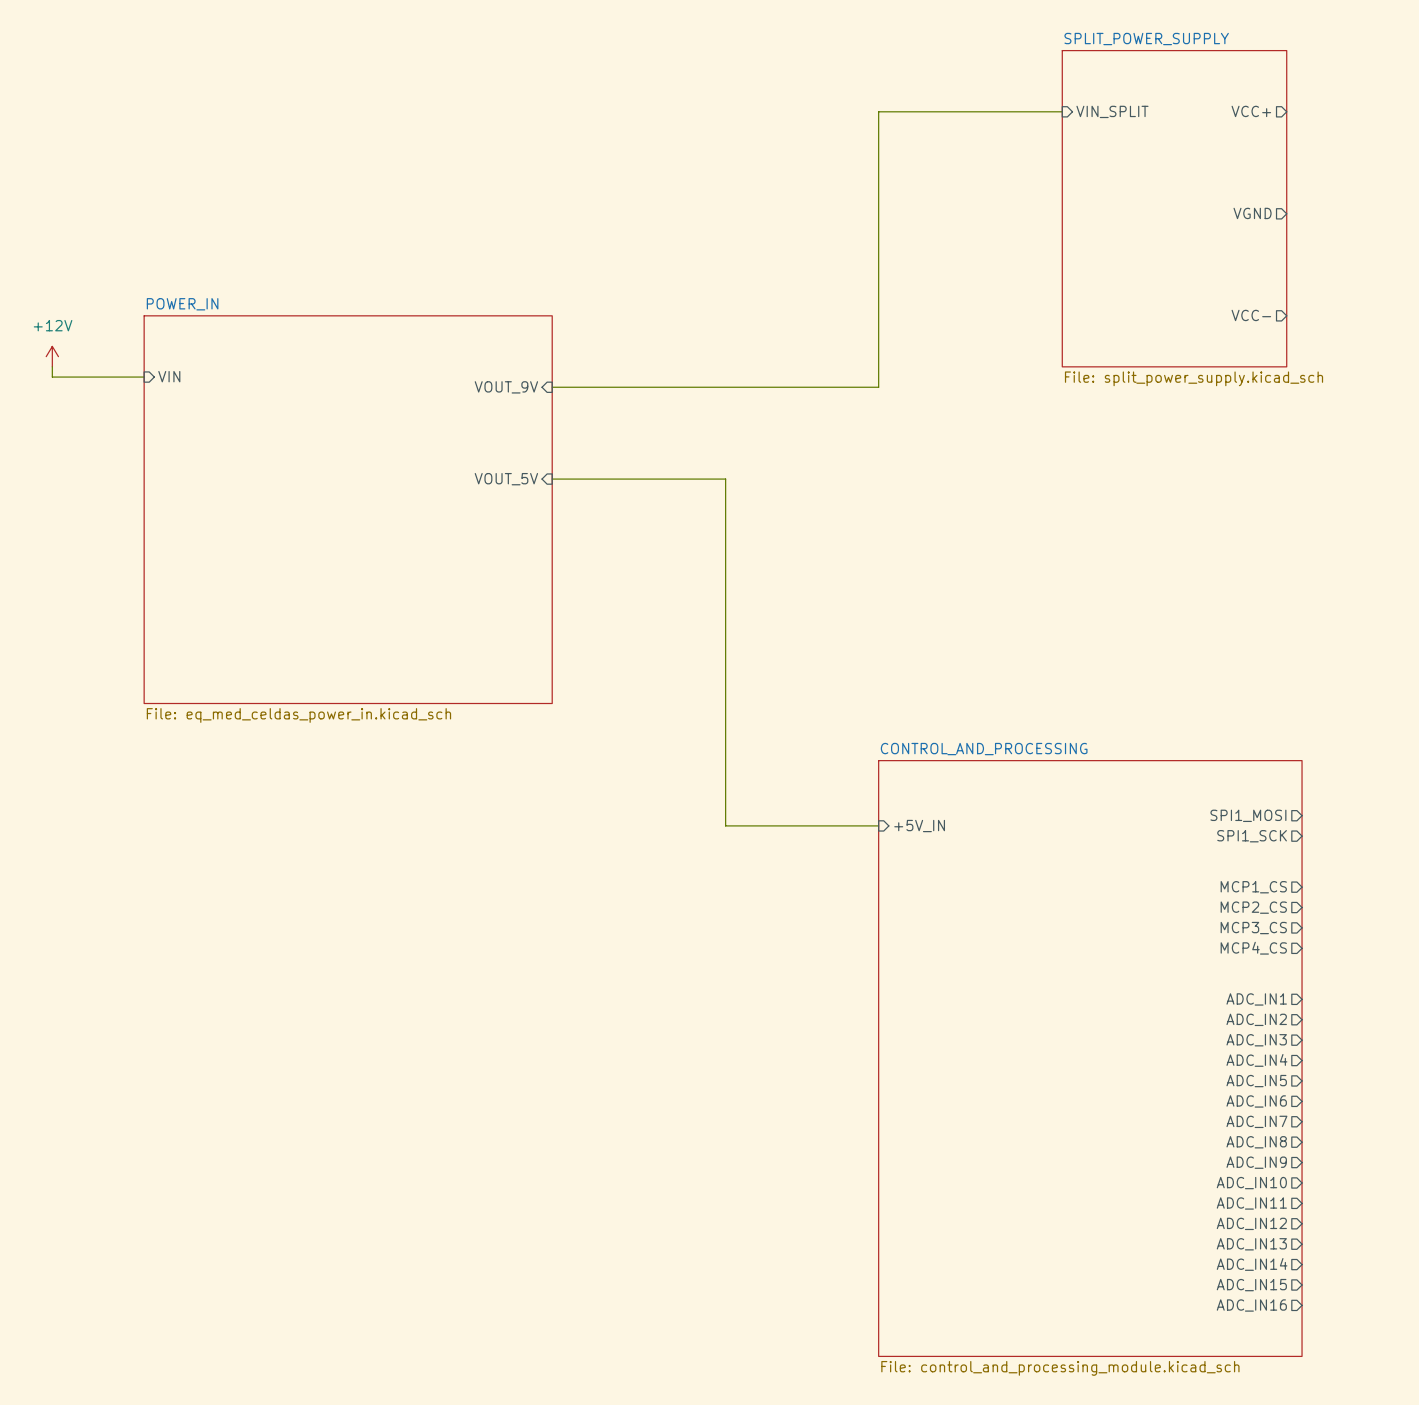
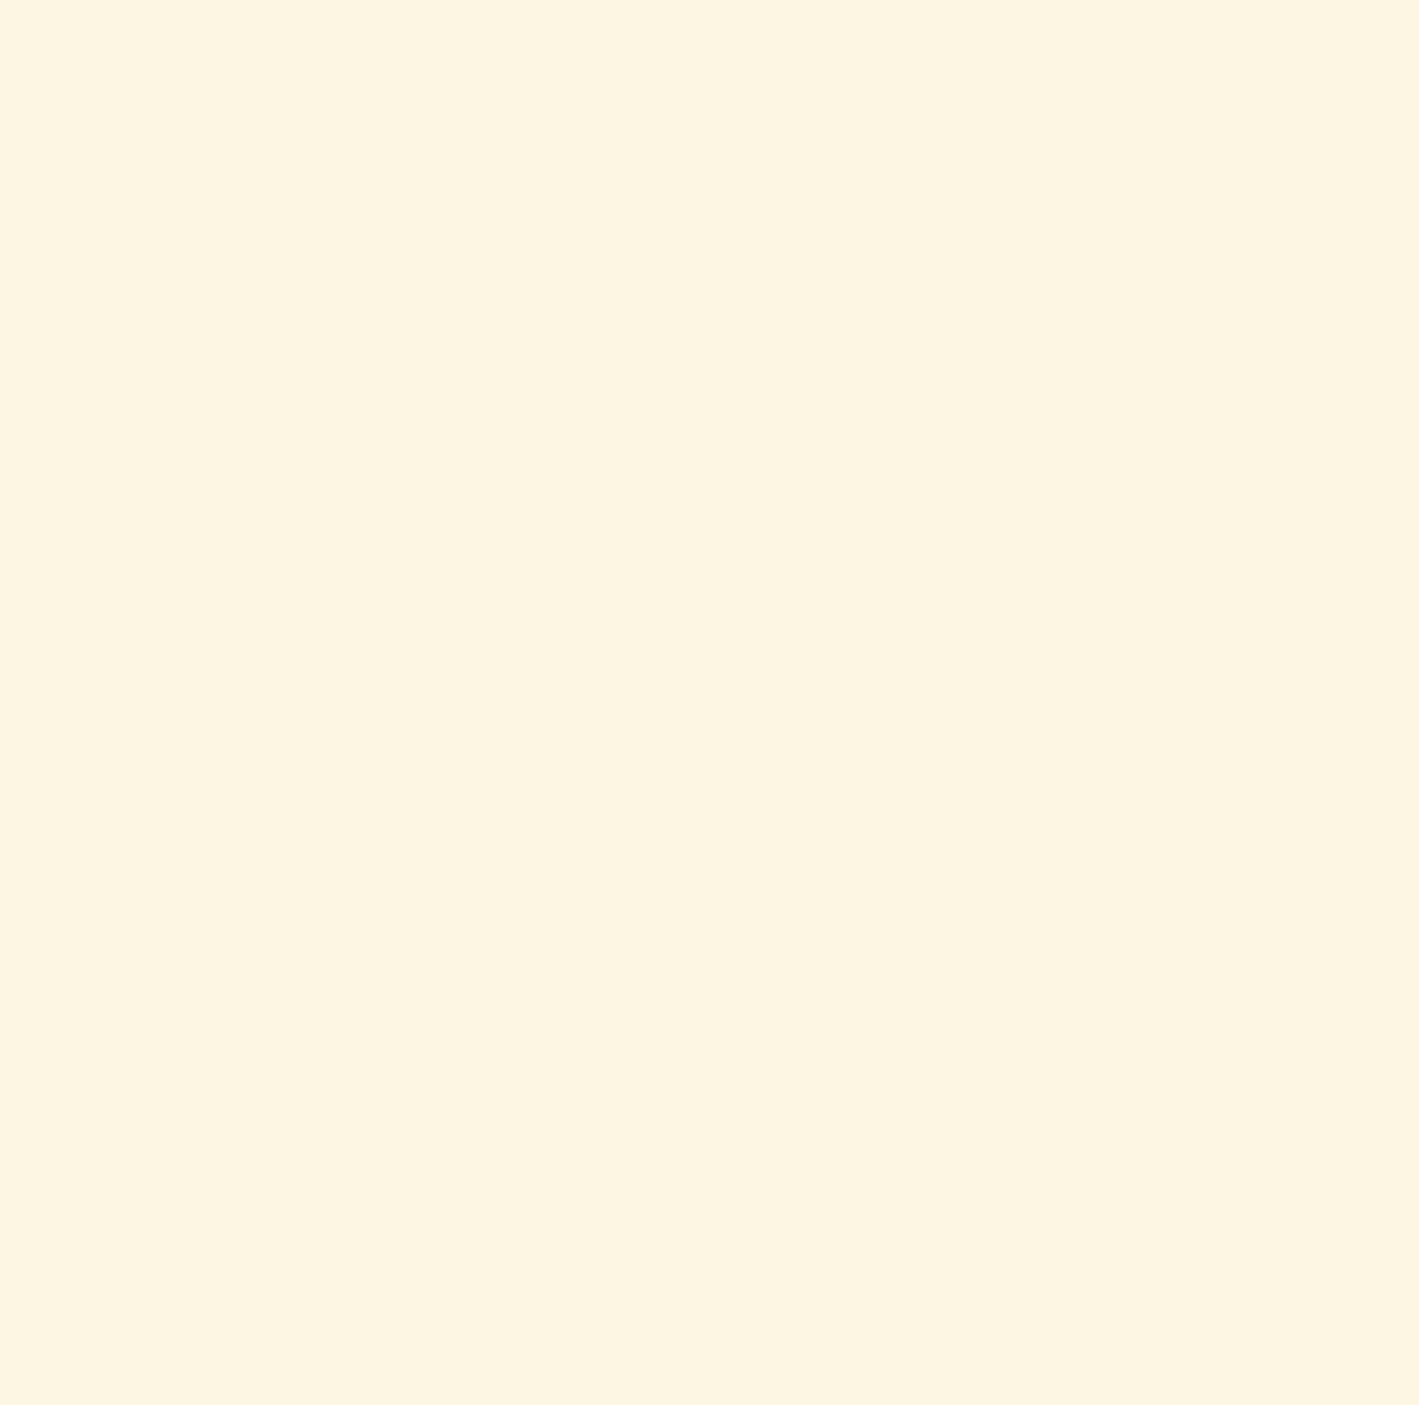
wire: (1062, 111) (878, 111) (878, 387) (552, 387) -> none
sheet pin: VIN_SPLIT (1112, 111) -> none
sheet pin: VCC+ (1251, 111) -> none
sheet SPLIT_POWER_SUPPLY: File: split_power_supply.kicad_sch (1174, 208) -> none
sheet pin: VGND (1252, 213) -> none
sheet pin: VCC- (1251, 315) -> none
power symbol: +12V (52, 356) -> none
wire: (52, 366) (52, 377) (144, 377) -> none
sheet pin: VIN (169, 376) -> none
sheet pin: VOUT_9V (506, 387) -> none
sheet pin: VOUT_5V (506, 479) -> none
wire: (552, 479) (725, 479) (725, 825) (878, 825) -> none
sheet POWER_IN: File: eq_med_celdas_power_in.kicad_sch (348, 509) -> none
sheet pin: SPI1_MOSI (1248, 815) -> none
sheet pin: +5V_IN (919, 826) -> none
sheet pin: SPI1_SCK (1252, 836) -> none
sheet pin: MCP1_CS (1253, 887) -> none
sheet pin: MCP2_CS (1253, 907) -> none
sheet pin: MCP3_CS (1253, 928) -> none
sheet pin: MCP4_CS (1253, 948) -> none
sheet pin: ADC_IN1 (1256, 999) -> none
sheet pin: ADC_IN2 (1256, 1019) -> none
sheet pin: ADC_IN3 (1256, 1040) -> none
sheet CONTROL_AND_PROCESSING: File: control_and_processing_module.kicad_sch (1090, 1058) -> none
sheet pin: ADC_IN4 (1256, 1060) -> none
sheet pin: ADC_IN5 (1256, 1081) -> none
sheet pin: ADC_IN6 (1256, 1101) -> none
sheet pin: ADC_IN7 (1256, 1121) -> none
sheet pin: ADC_IN8 (1256, 1142) -> none
sheet pin: ADC_IN9 (1256, 1162) -> none
sheet pin: ADC_IN10 (1251, 1183) -> none
sheet pin: ADC_IN11 (1251, 1203) -> none
sheet pin: ADC_IN12 (1251, 1223) -> none
sheet pin: ADC_IN13 (1251, 1244) -> none
sheet pin: ADC_IN14 (1252, 1264) -> none
sheet pin: ADC_IN15 (1251, 1285) -> none
sheet pin: ADC_IN16 (1251, 1305) -> none

